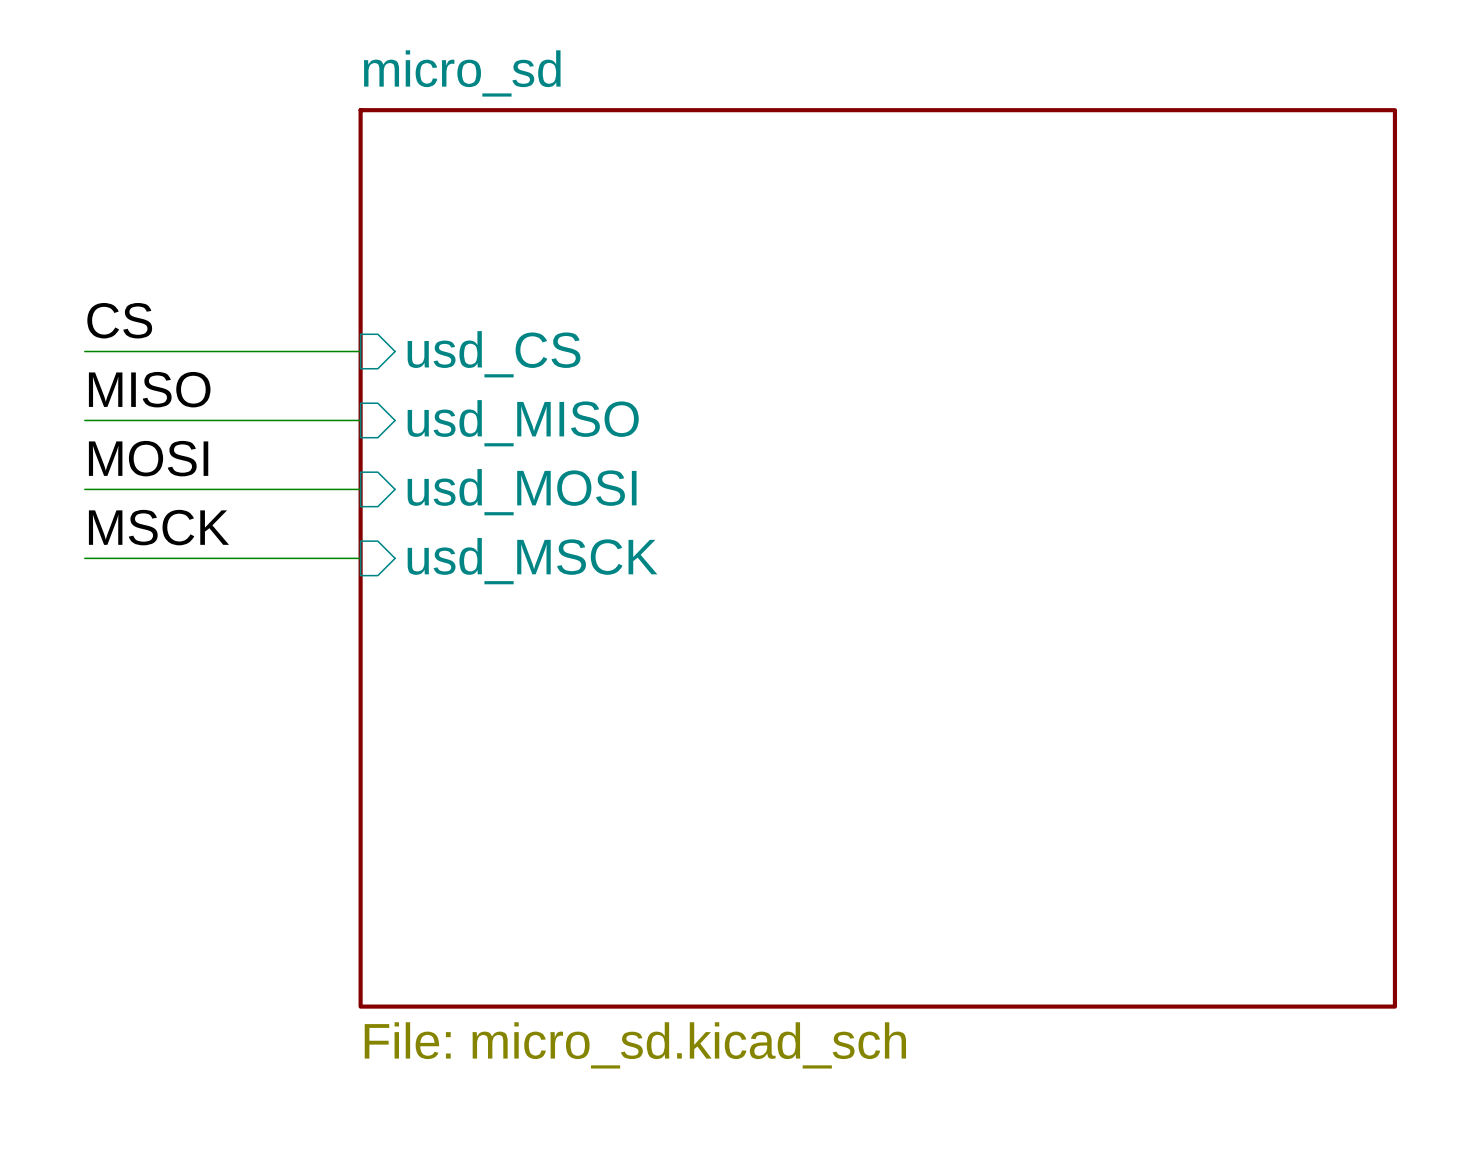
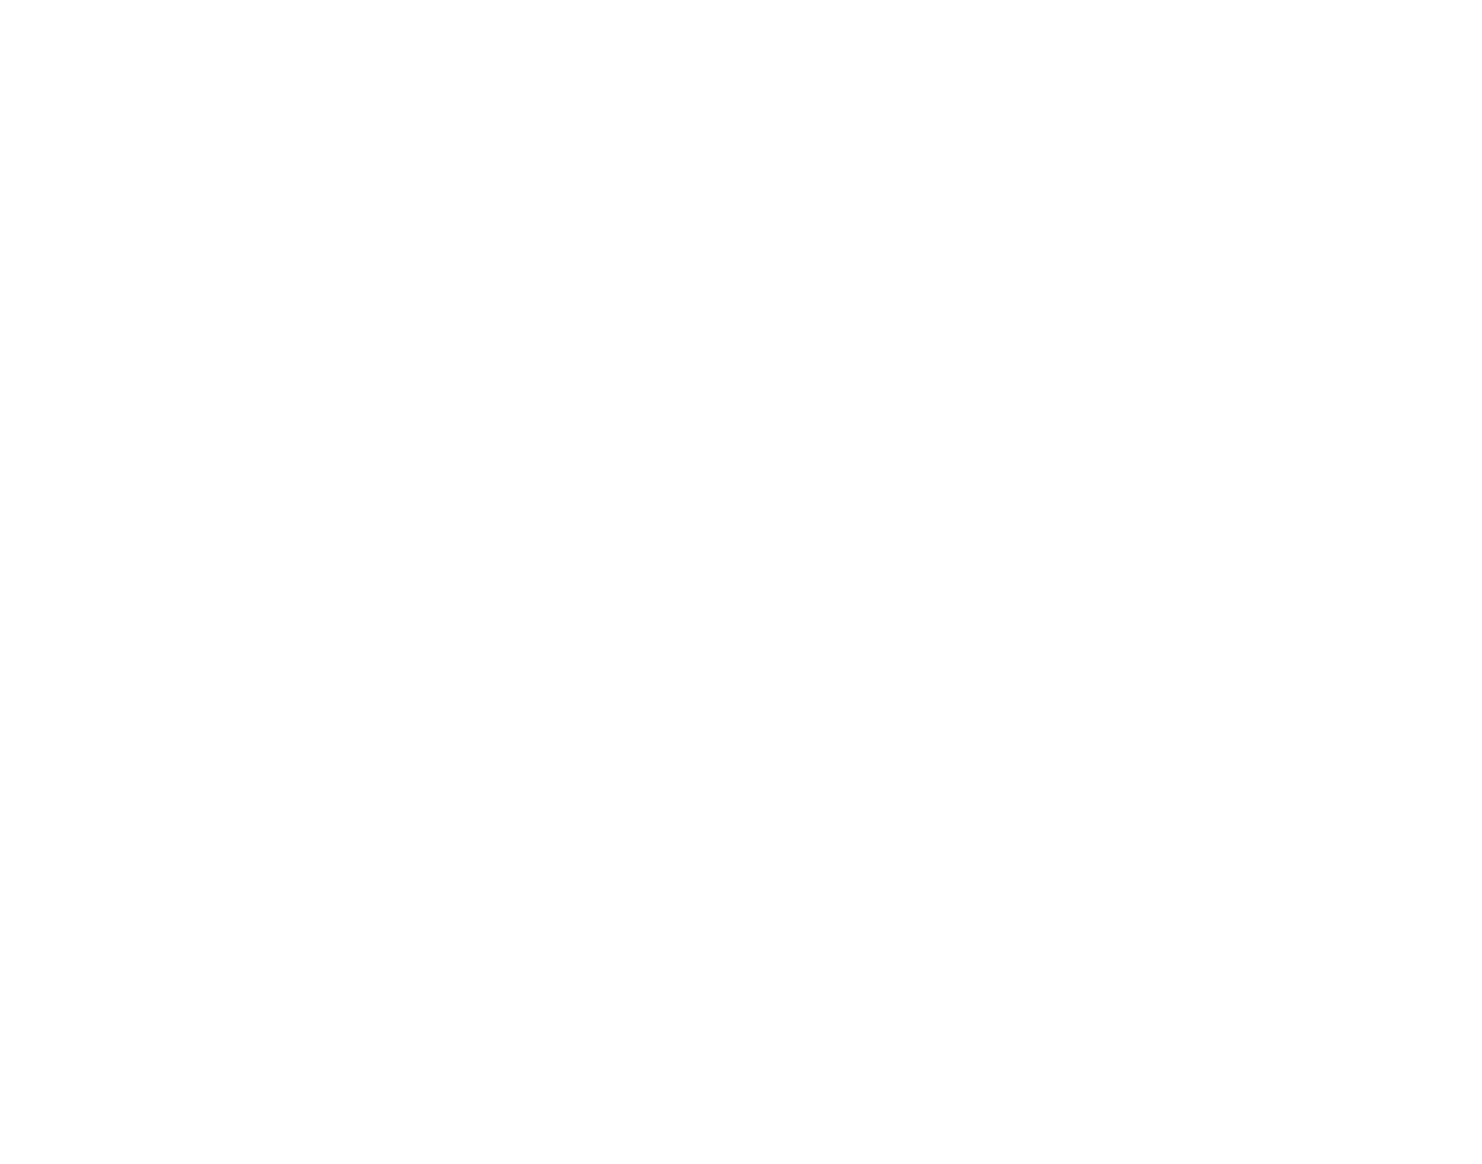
label: CS (119, 320) -> none
wire: (84, 351) (360, 351) -> none
sheet pin: usd_CS (494, 354) -> none
label: MISO (149, 389) -> none
wire: (84, 420) (360, 420) -> none
sheet pin: usd_MISO (523, 423) -> none
label: MOSI (148, 458) -> none
wire: (84, 489) (360, 489) -> none
sheet pin: usd_MOSI (522, 492) -> none
label: MSCK (158, 527) -> none
wire: (84, 558) (360, 558) -> none
sheet micro_sd: File: micro_sd.kicad_sch (877, 558) -> none
sheet pin: usd_MSCK (532, 561) -> none

